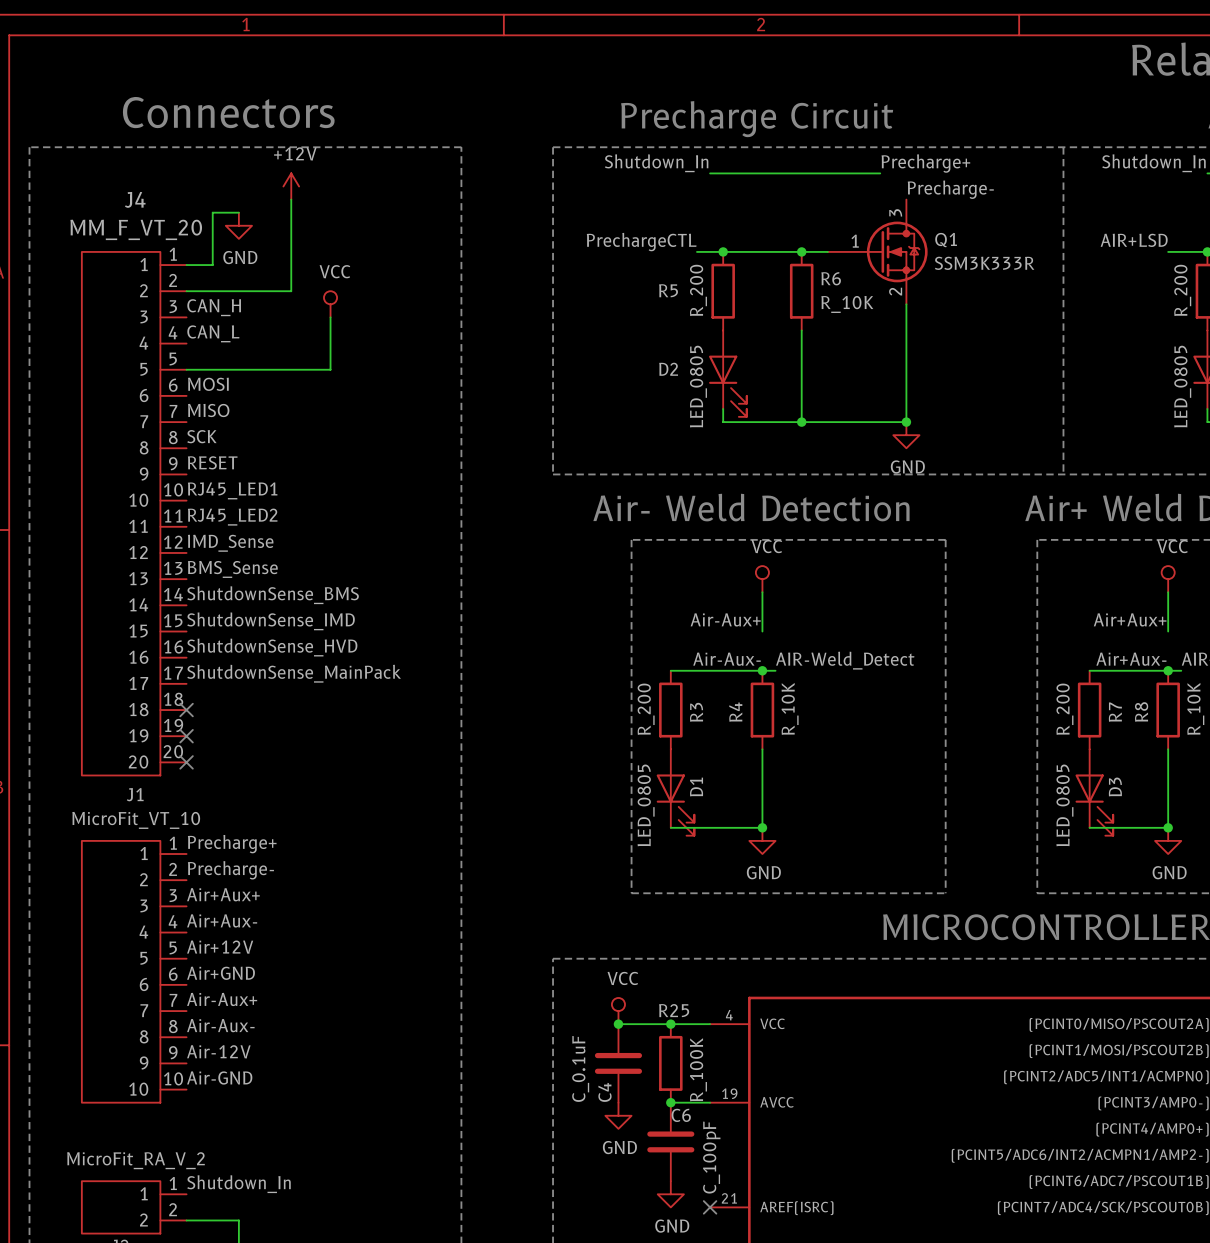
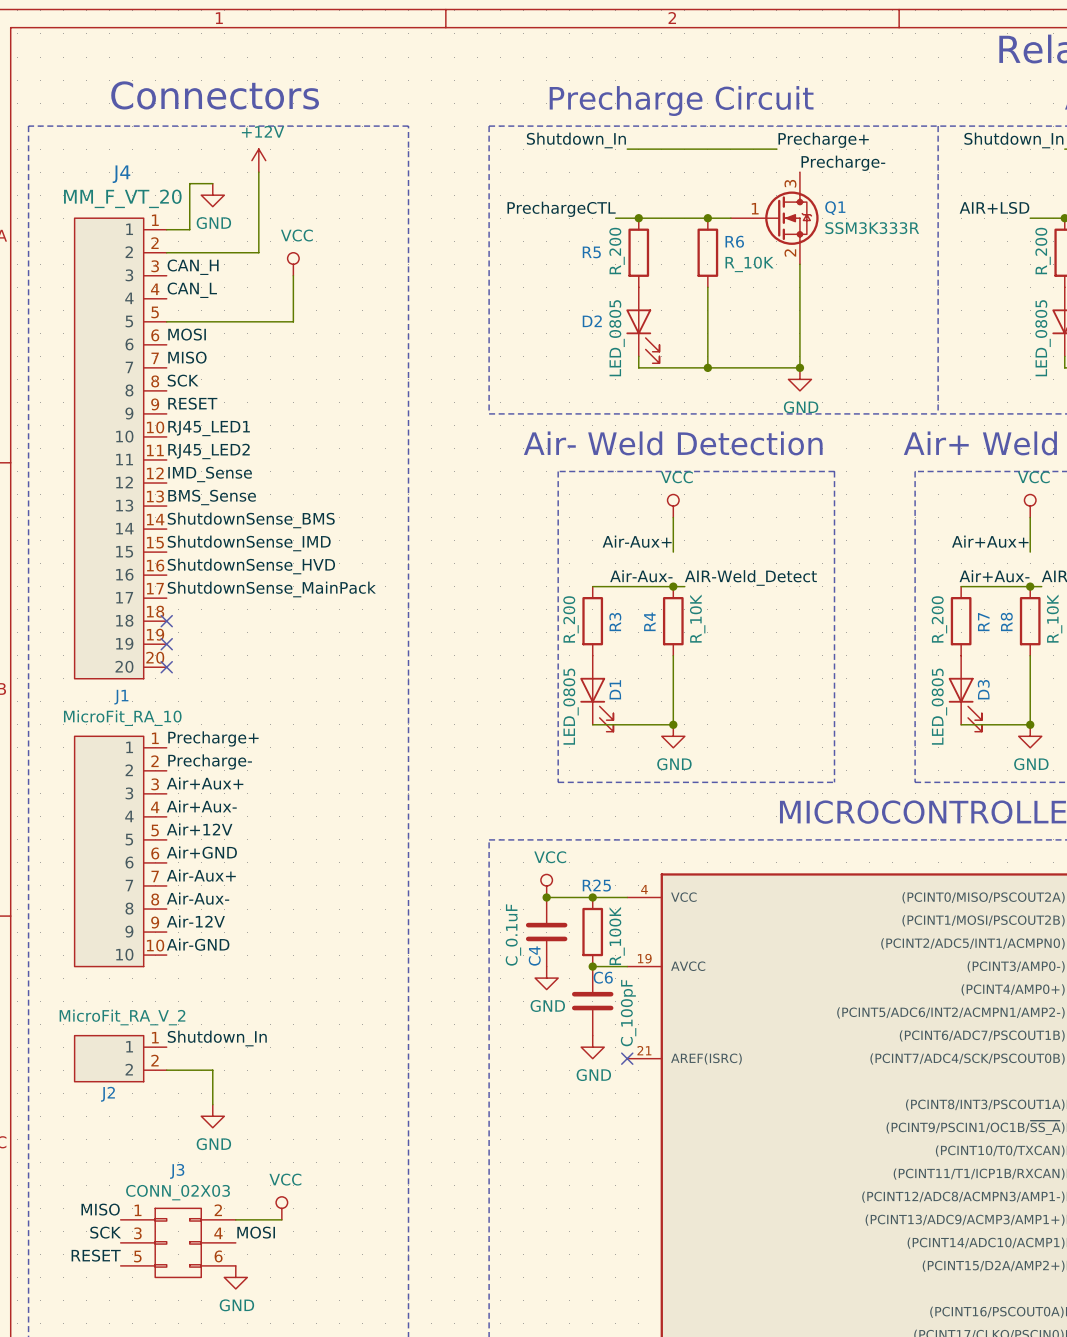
J1 value: MicroFit_VT_10 (136, 820) -> MicroFit_RA_10 (122, 718)

